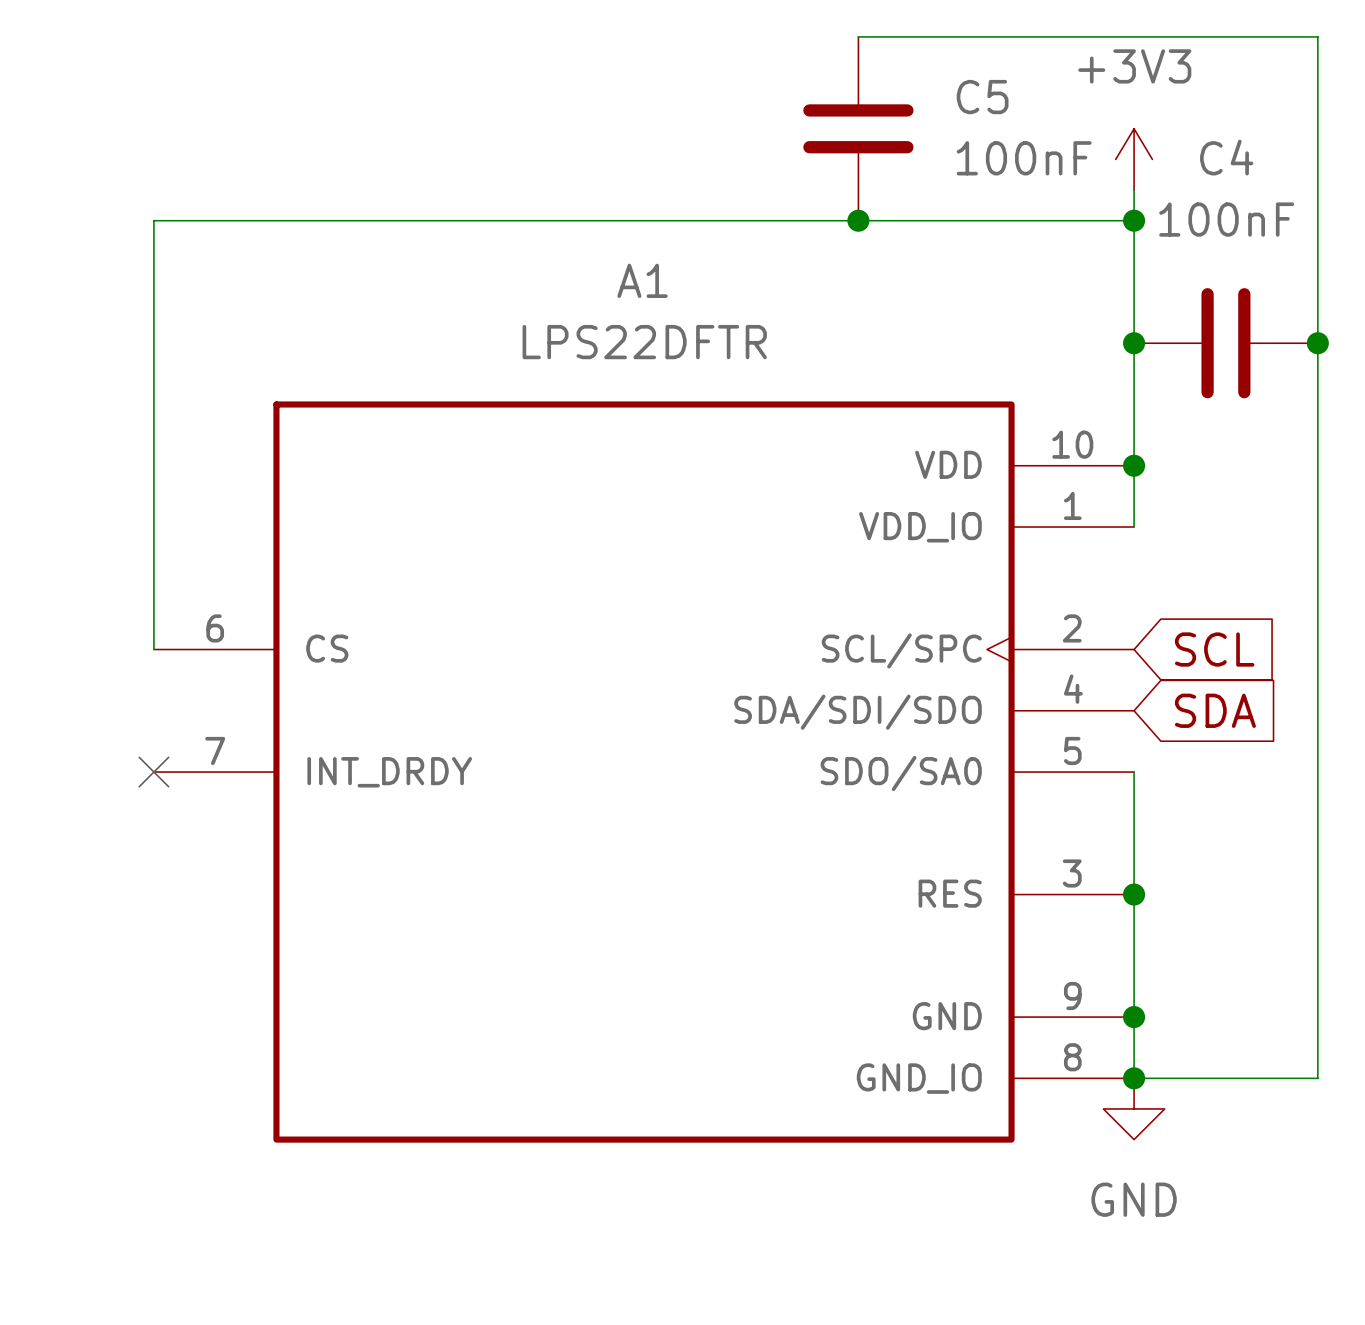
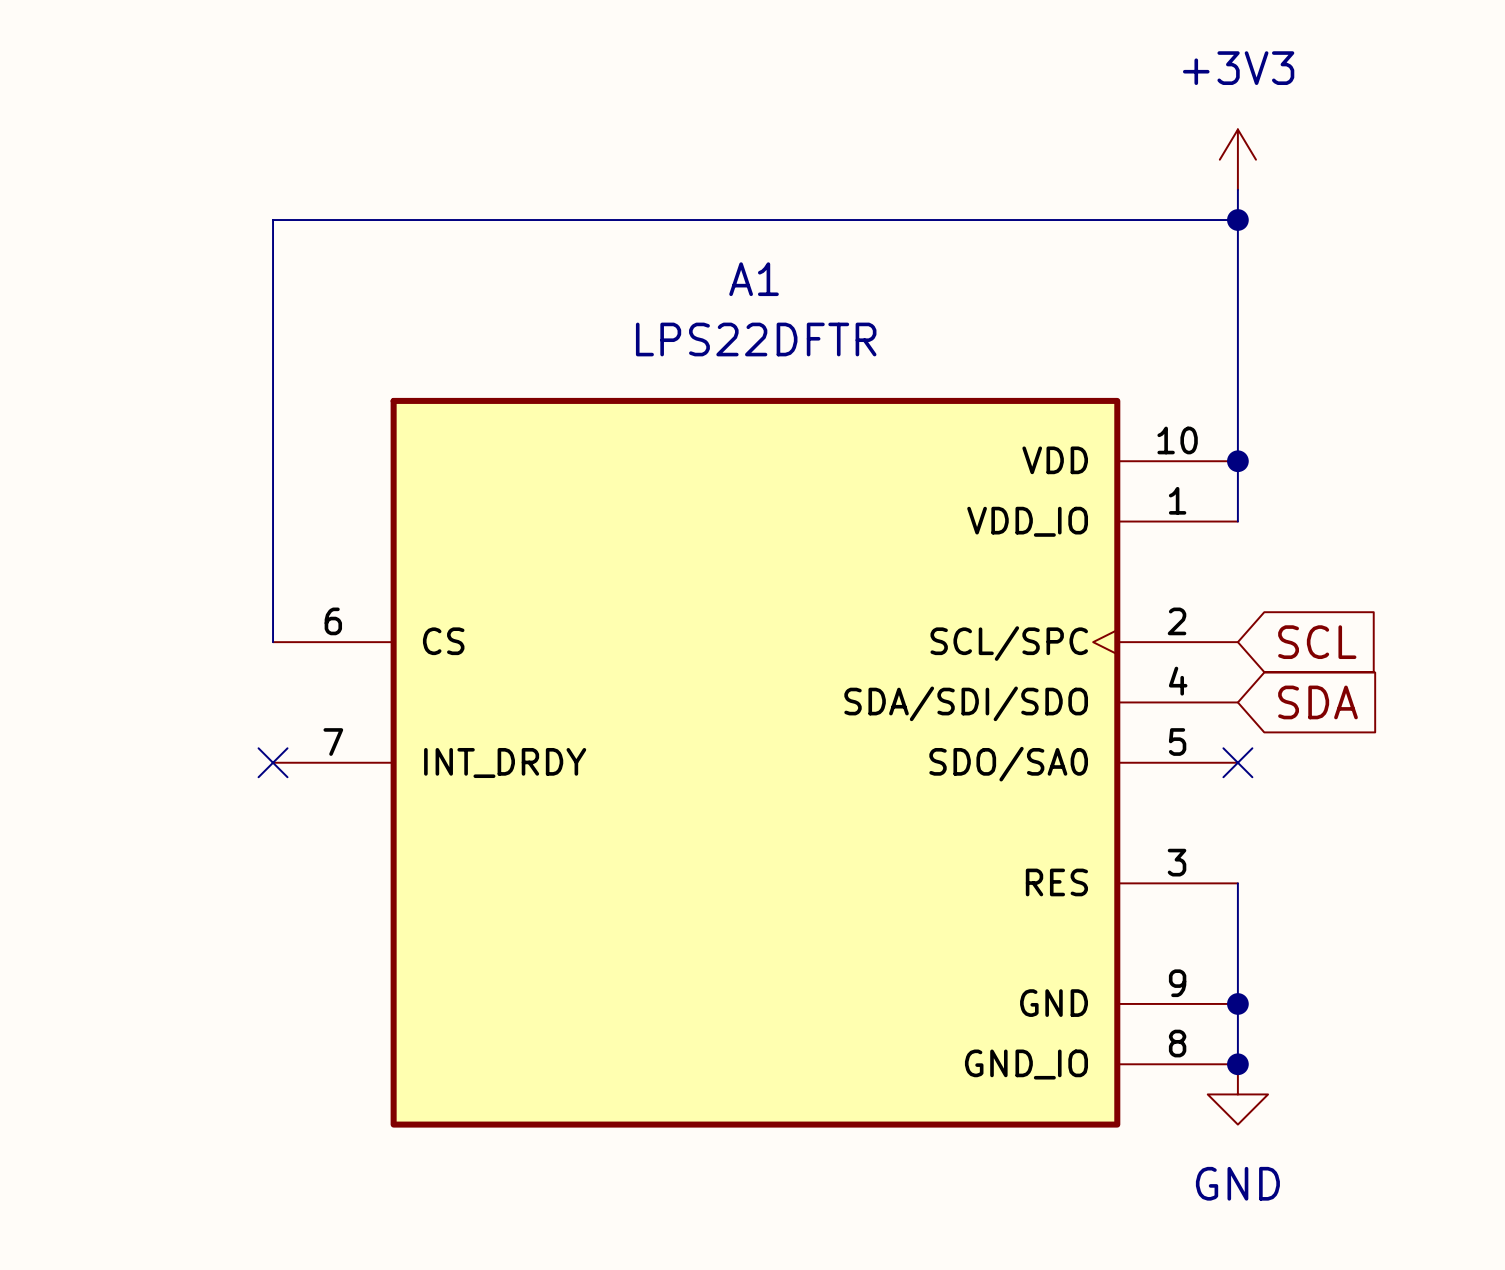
wire: (858, 36) (1317, 36) (1317, 1078) (1134, 1078) -> none
C5: 100nF (858, 128) -> none
junction: (858, 220) -> none
junction: (1134, 343) -> none
C4: 100nF (1225, 343) -> none
junction: (1317, 343) -> none
wire: (1134, 772) (1134, 894) -> none
no-connect mark: none -> (1237, 762)
junction: (1134, 894) -> none

